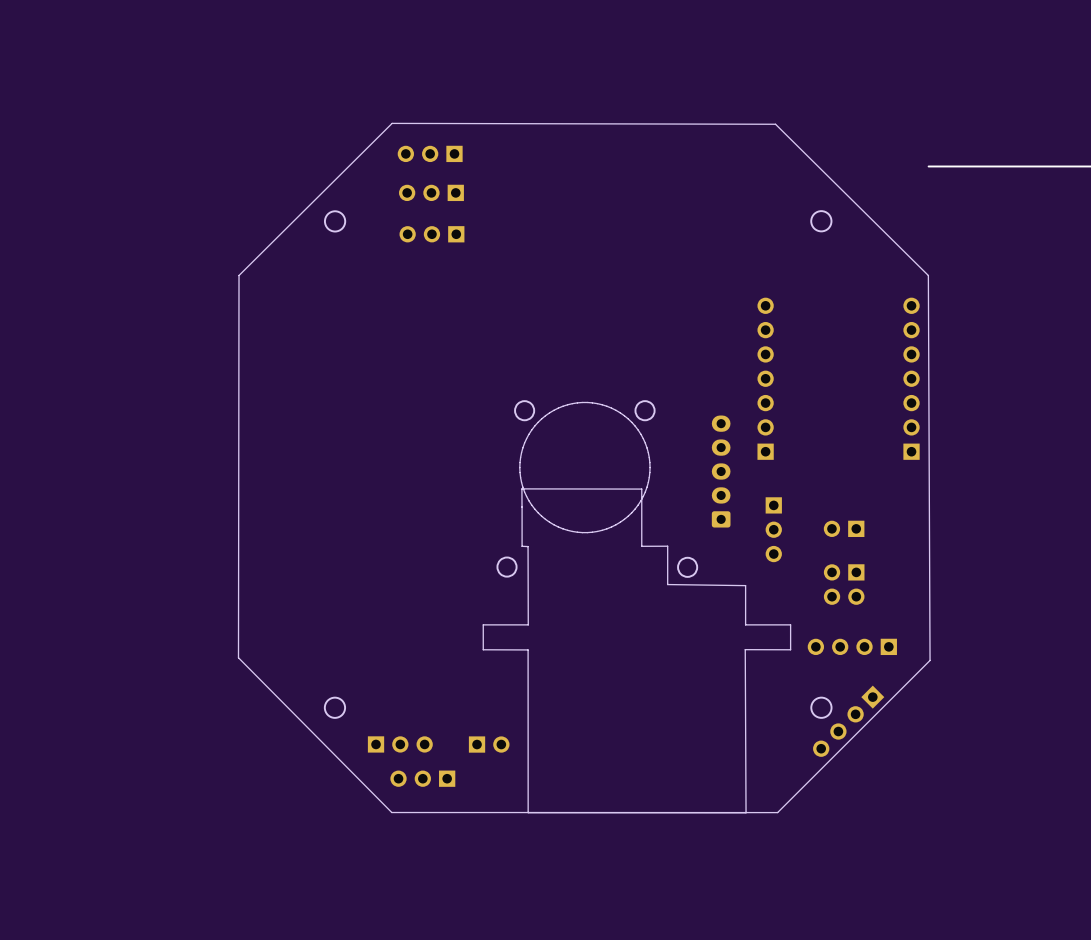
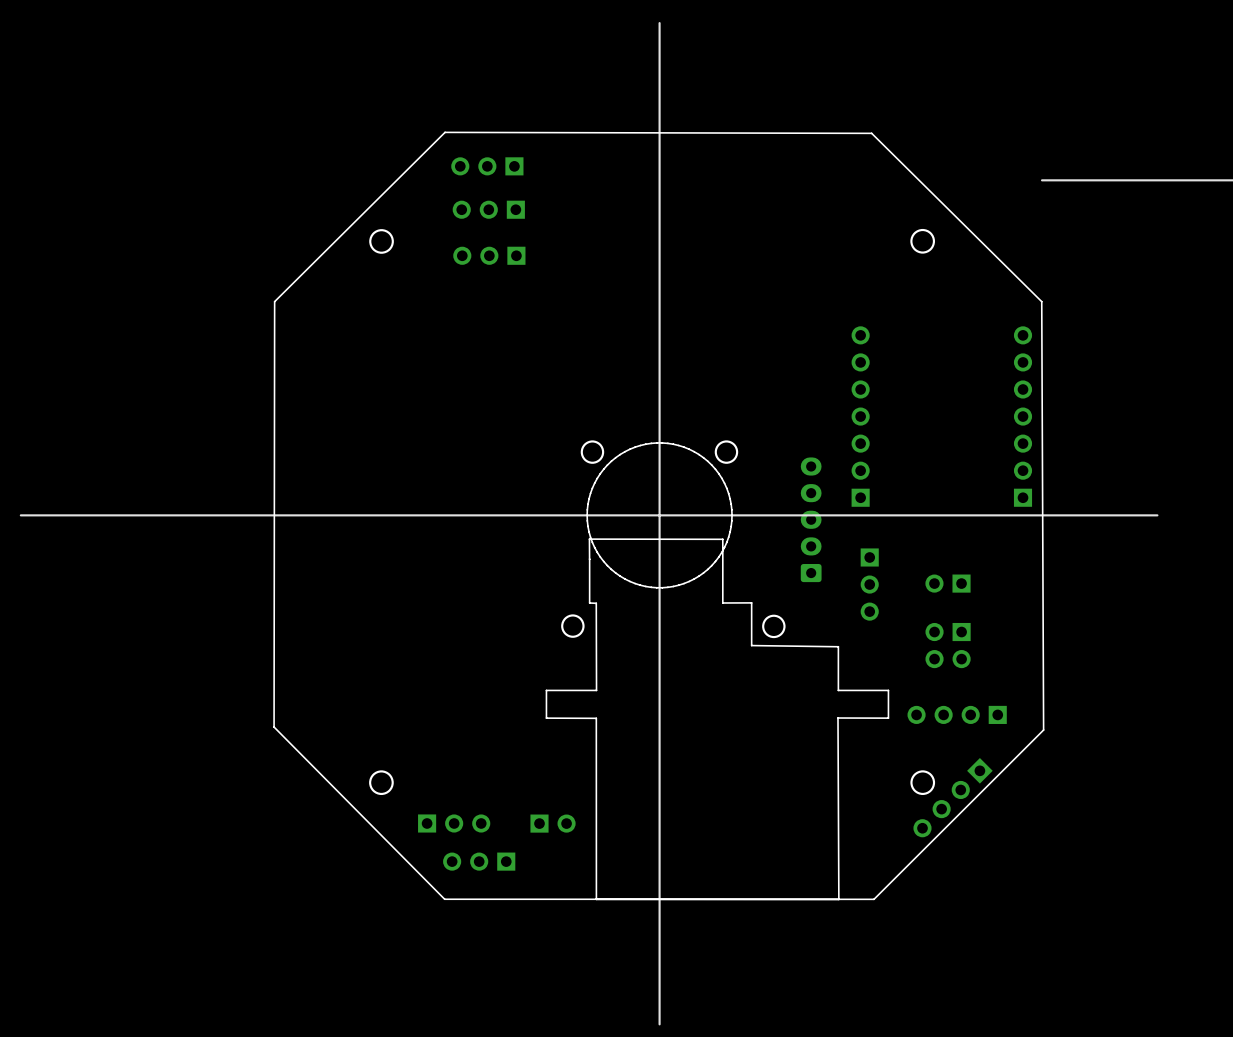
line: none -> (659, 23) (659, 1024)
line: none -> (1157, 515) (20, 515)

